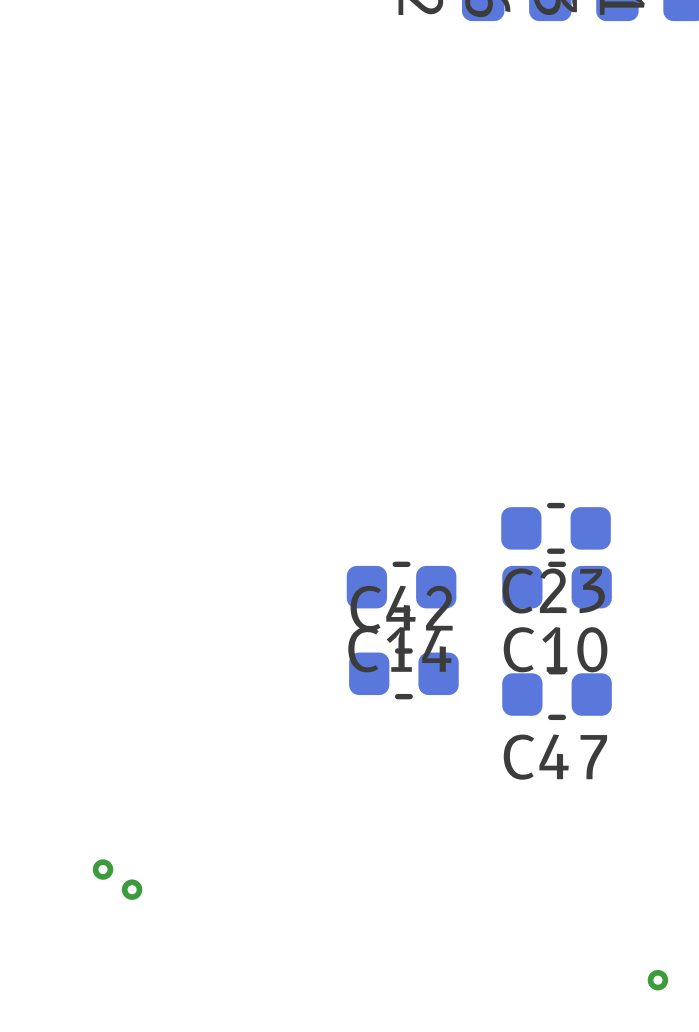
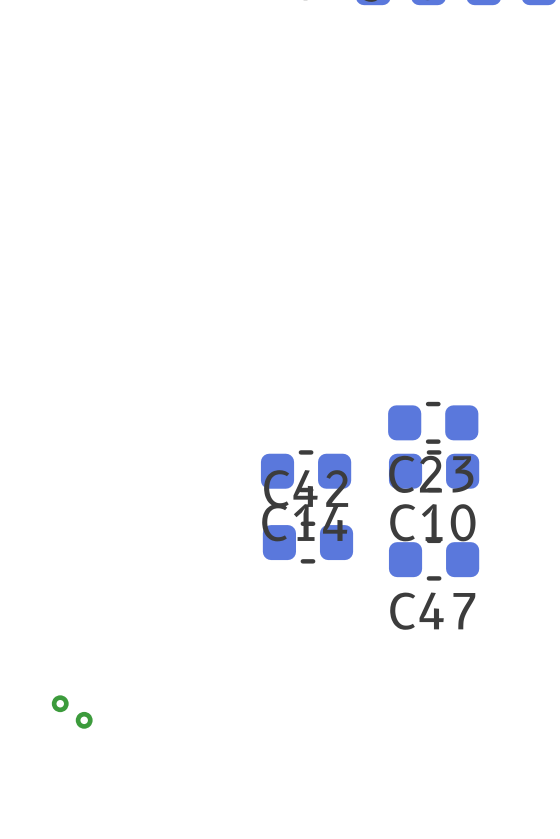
via: (657, 980) -> none

